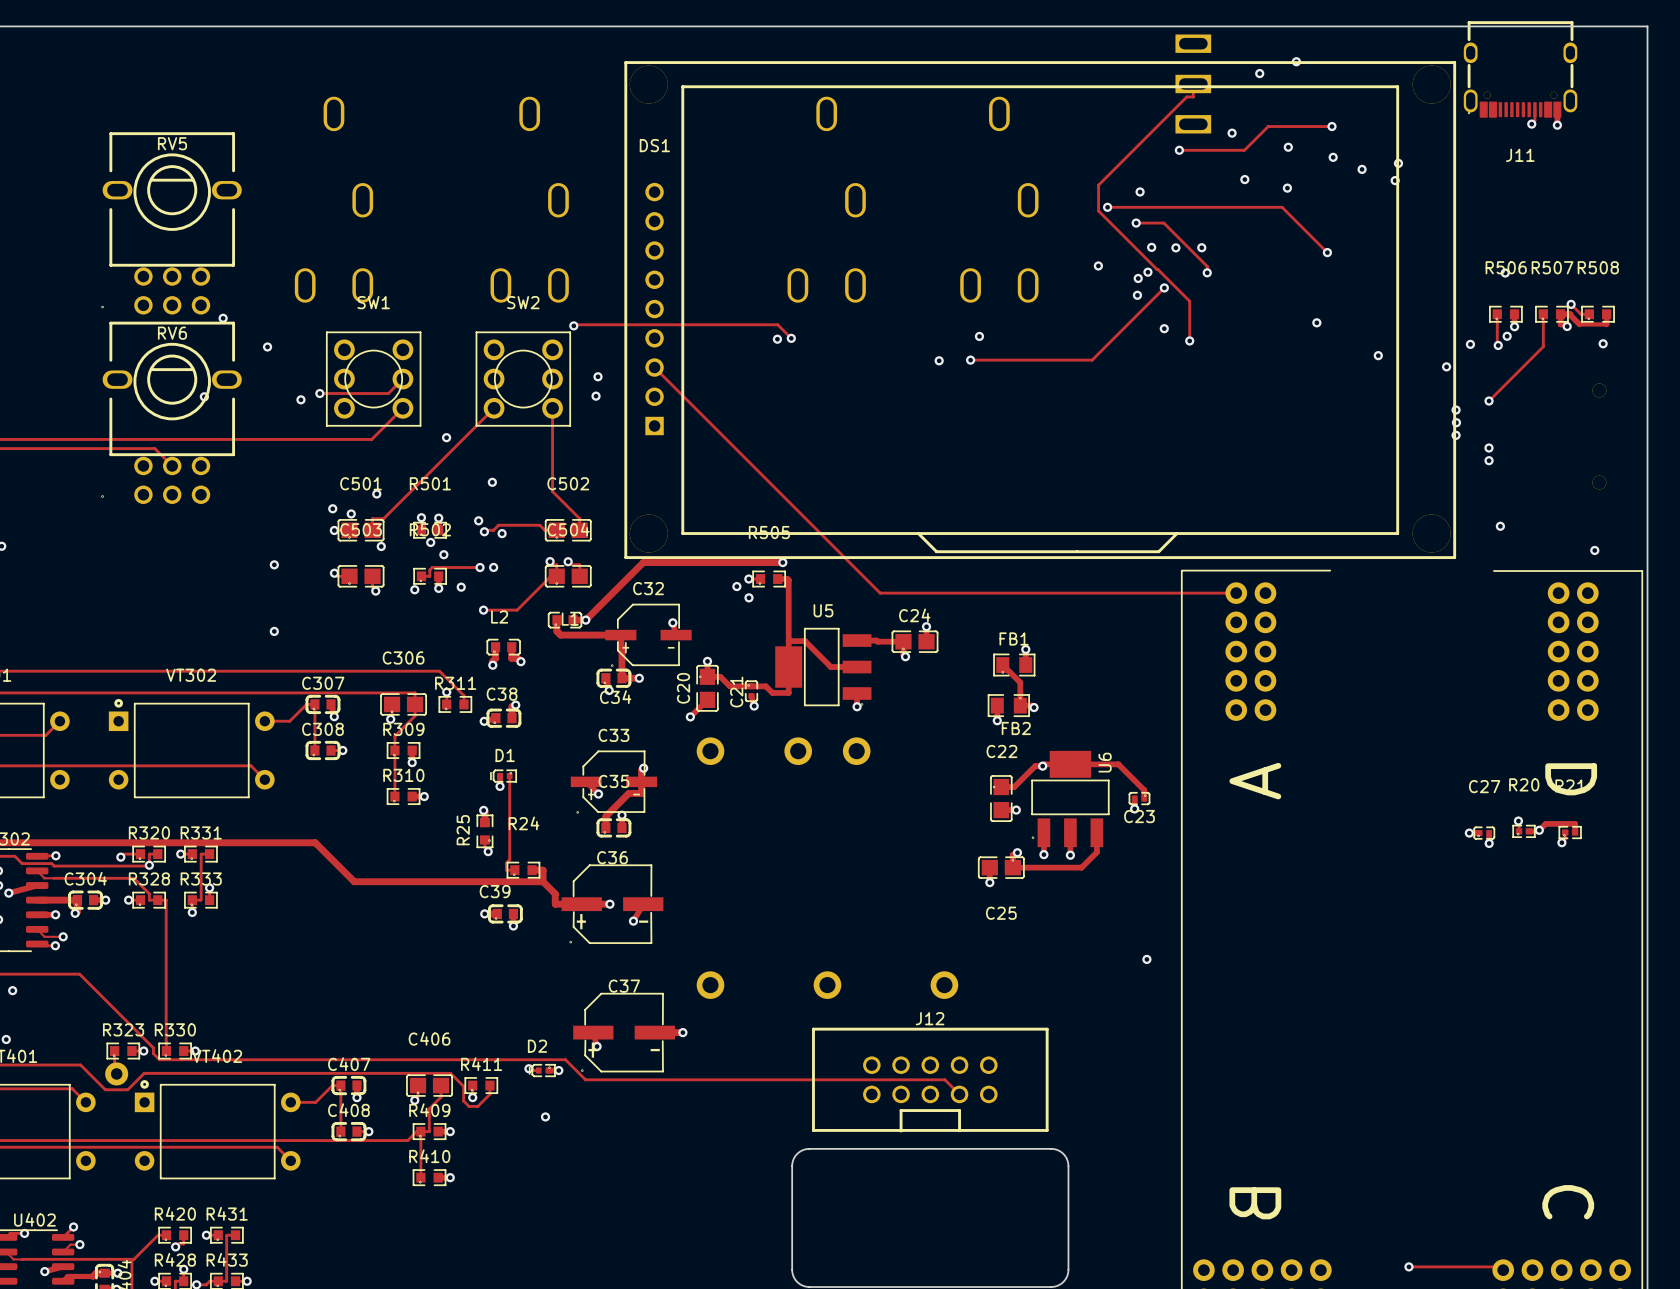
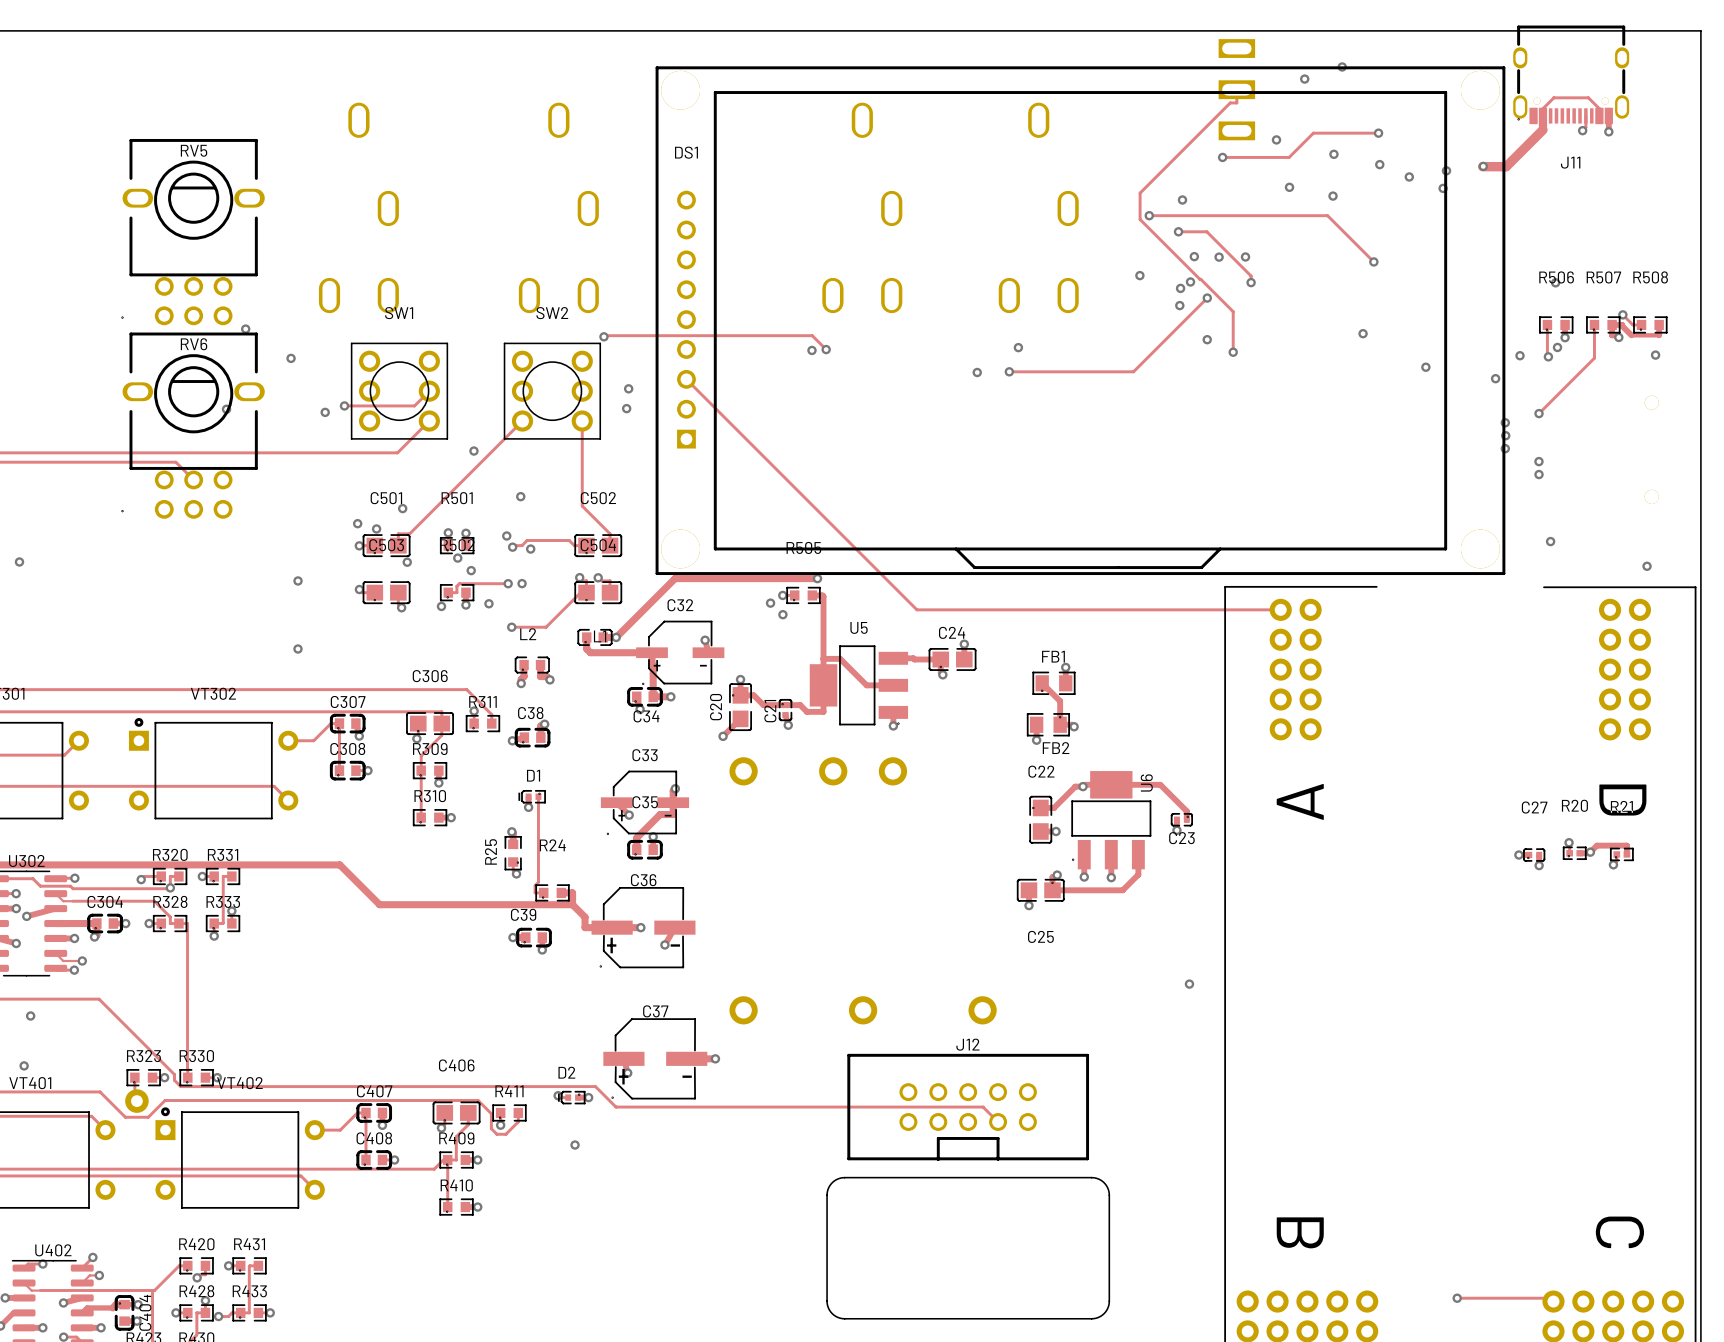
track: none -> (1599, 115) (1599, 108) (1588, 97) (1553, 97) (1542, 108) (1542, 129) (1506, 166) (1483, 166)
via: none -> (1483, 166)

